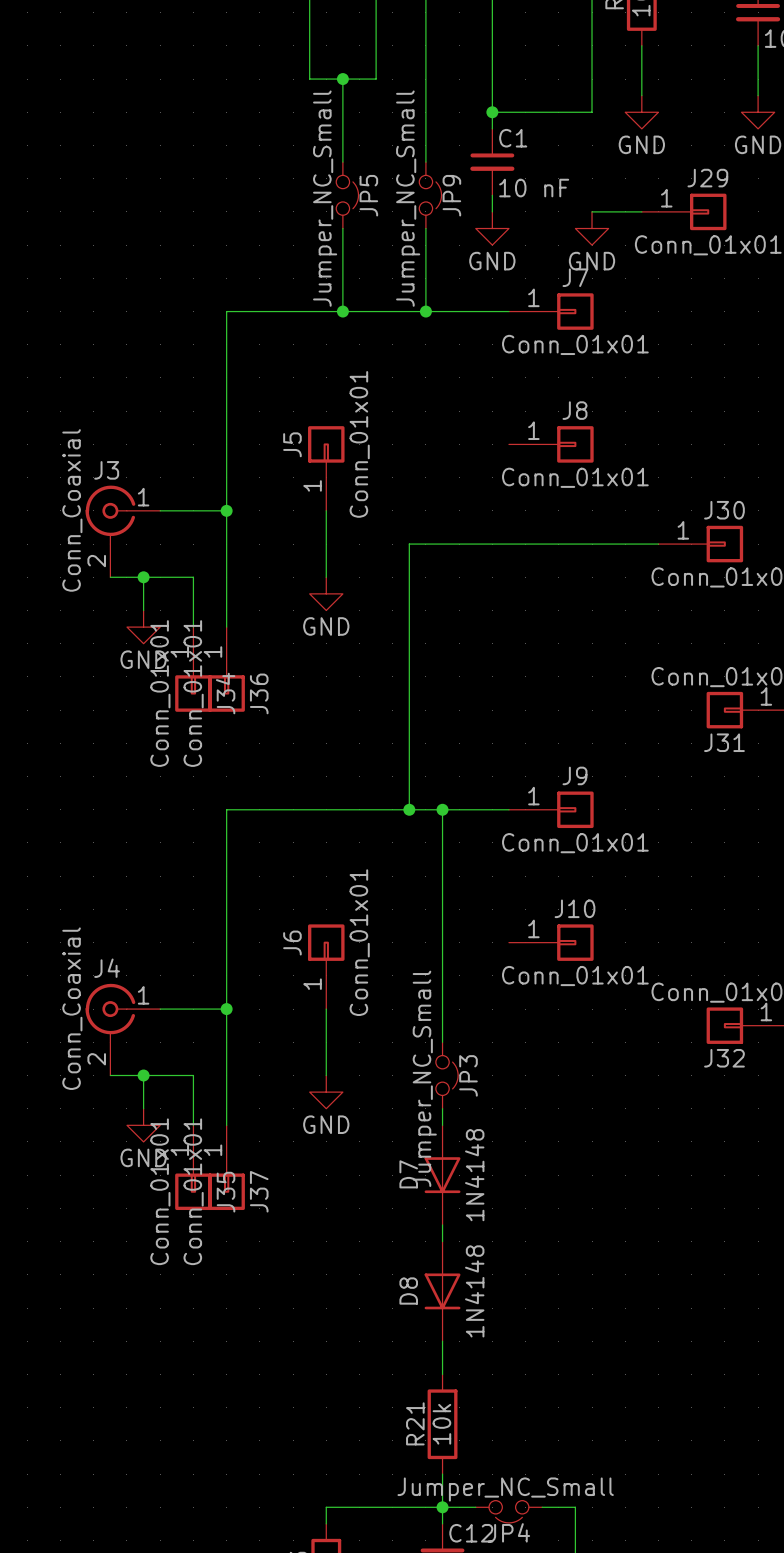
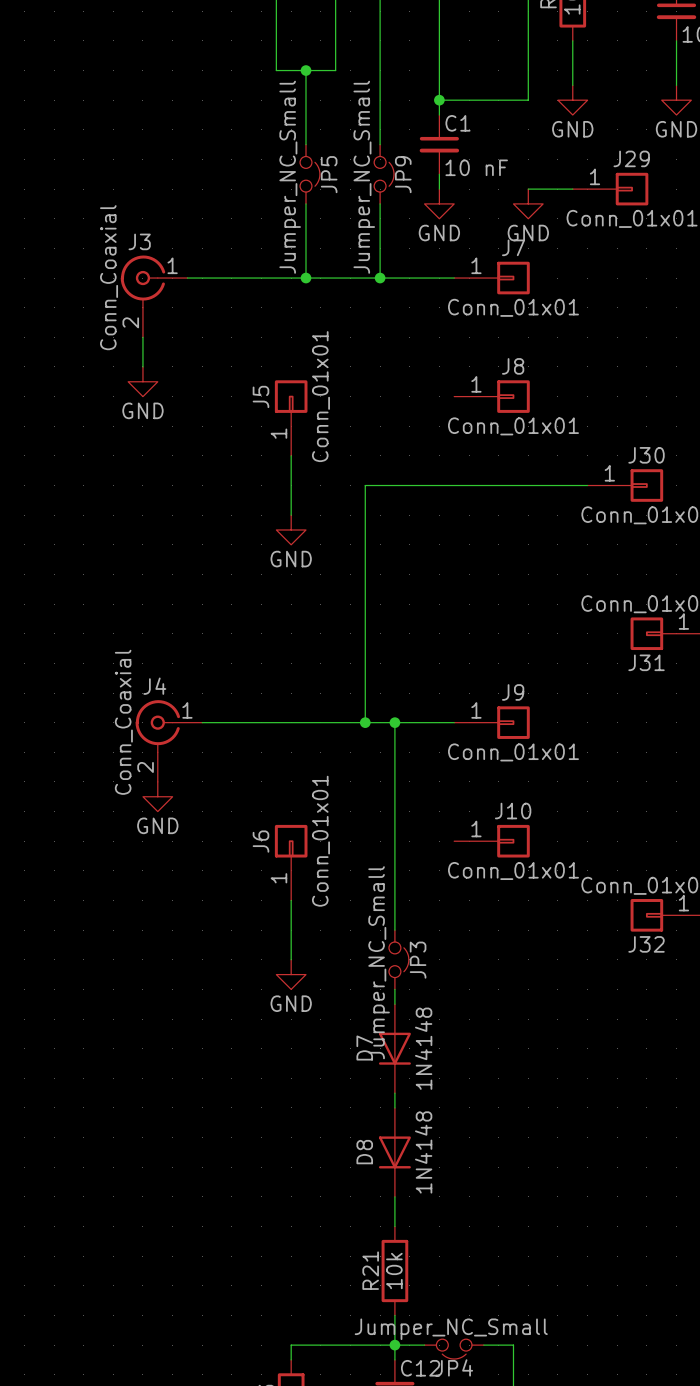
wire: (226, 311) (226, 627) -> (202, 278) (187, 278)
power symbol: none -> GND (142, 381)
wire: (160, 510) (226, 510) -> none
junction: (226, 510) -> none
J3 position: (122, 531) -> (154, 296)
wire: (110, 577) (193, 577) (193, 627) -> none
wire: (143, 577) (143, 610) -> (142, 337) (142, 366)
junction: (143, 577) -> none
power symbol: GND (143, 627) -> none
J34: Conn_01x01 (193, 669) -> none
J36: Conn_01x01 (226, 669) -> none
wire: (226, 809) (226, 1125) -> none
power symbol: none -> GND (157, 796)
wire: (160, 1009) (226, 1009) -> none
junction: (226, 1009) -> none
J4 position: (122, 1029) -> (168, 741)
wire: (110, 1075) (193, 1075) (193, 1125) -> none
wire: (143, 1075) (143, 1108) -> none
junction: (143, 1075) -> none
power symbol: GND (143, 1125) -> none
J35: Conn_01x01 (193, 1167) -> none
J37: Conn_01x01 (226, 1167) -> none

